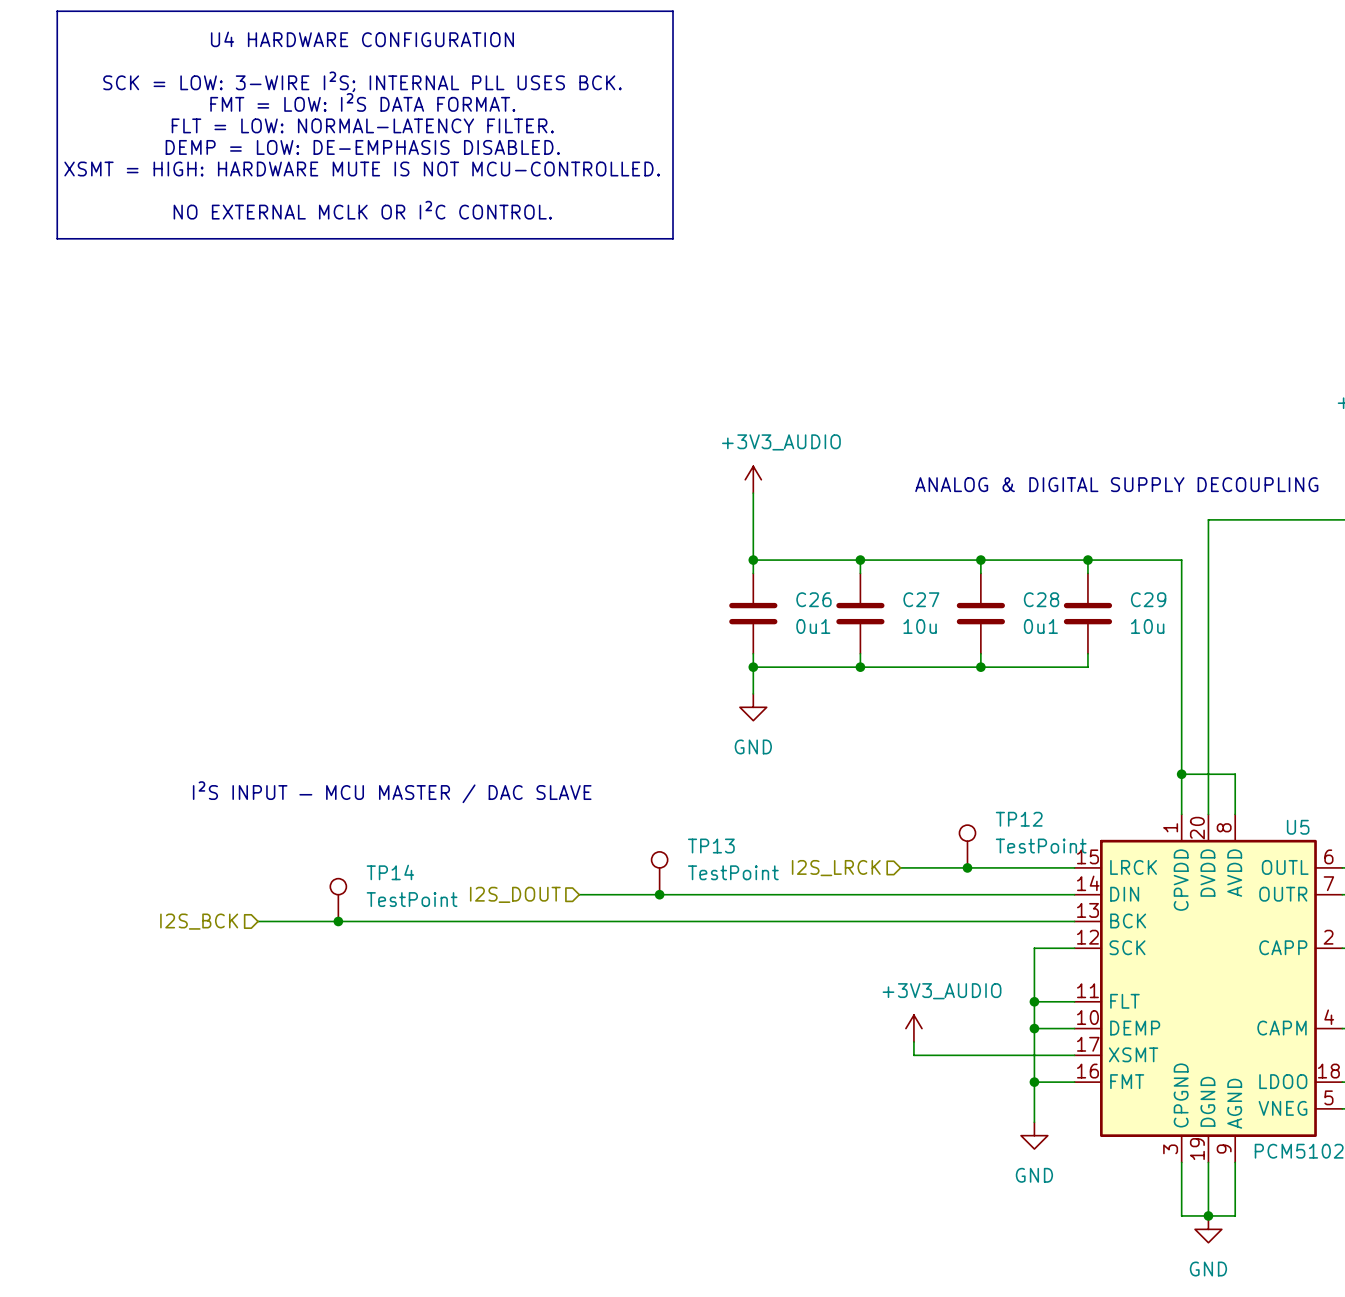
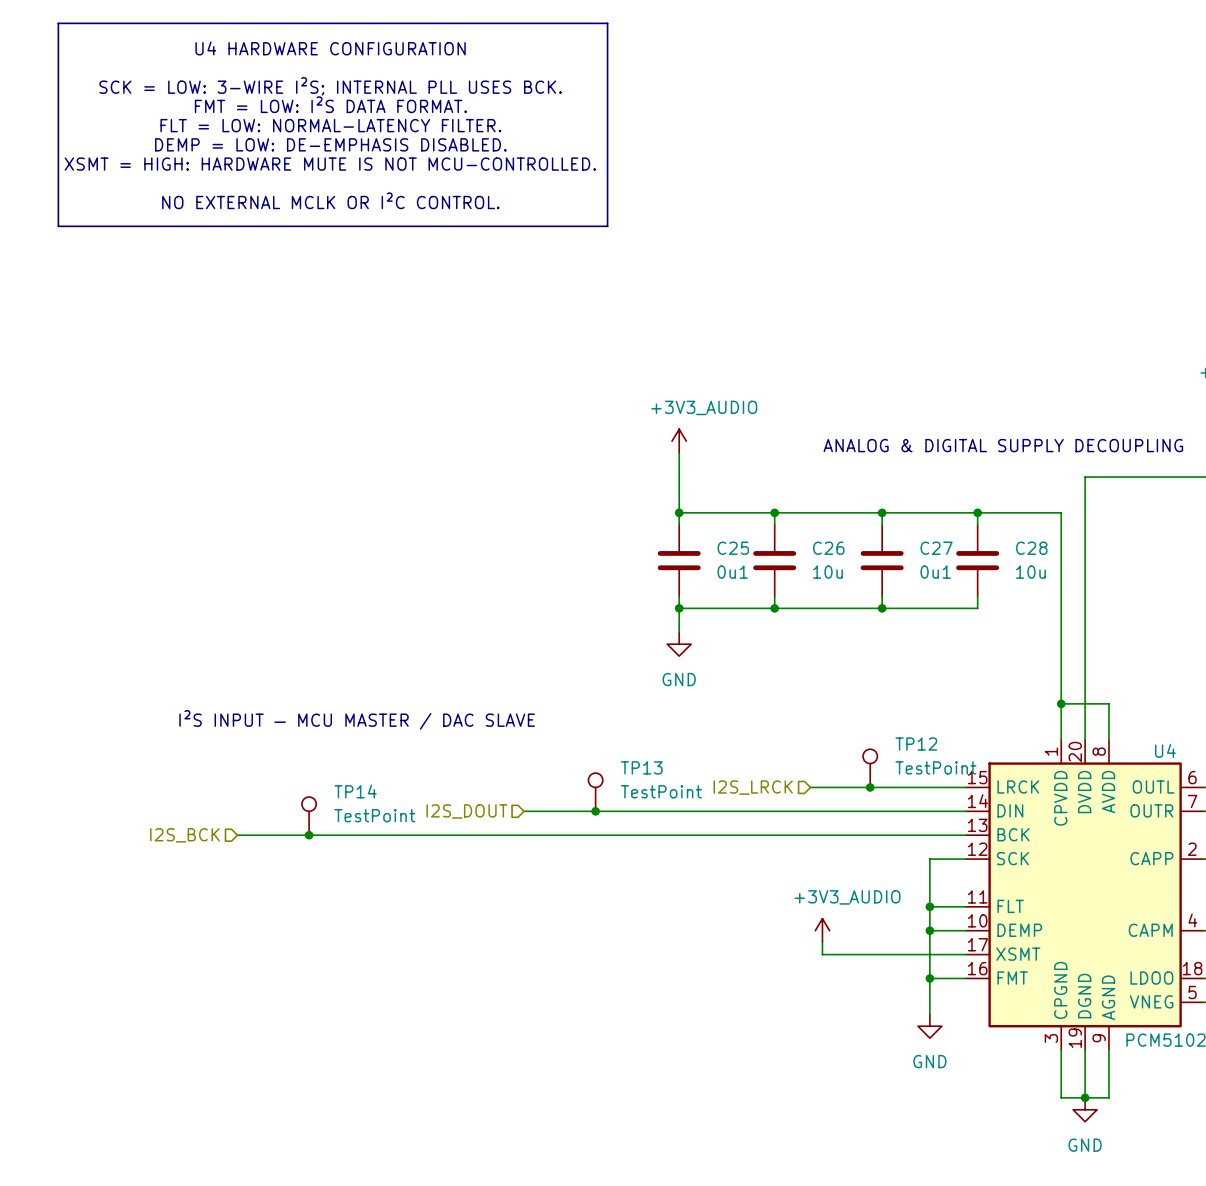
C26 name: C26 (813, 599) -> C25 (733, 548)
C27 name: C27 (921, 599) -> C26 (828, 548)
C28 name: C28 (1041, 599) -> C27 (936, 548)
C29 name: C29 (1148, 599) -> C28 (1031, 548)
U5 name: U5 (1298, 827) -> U4 (1165, 750)

